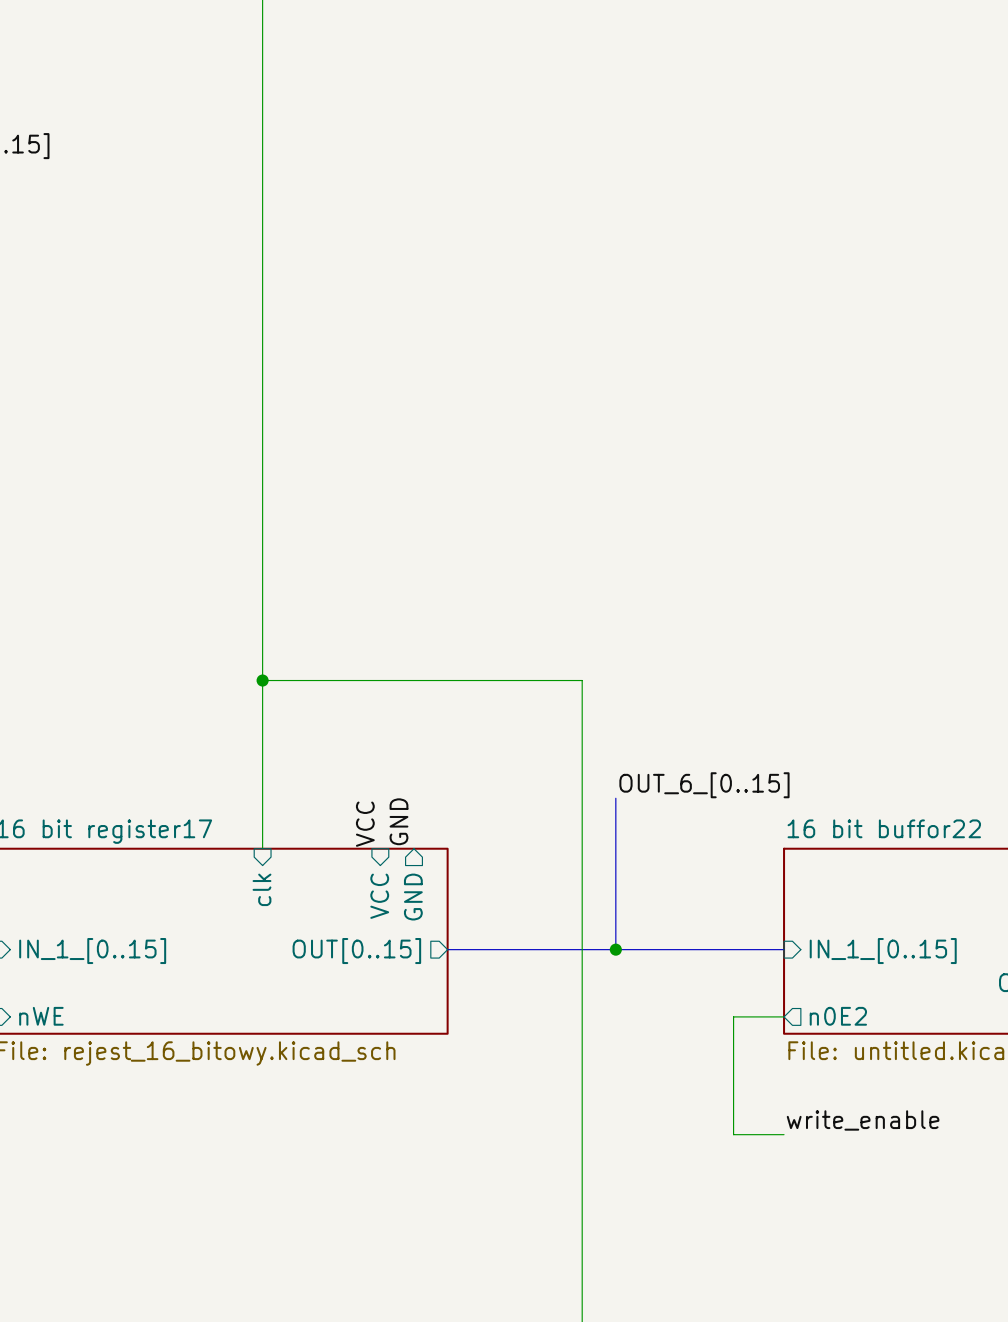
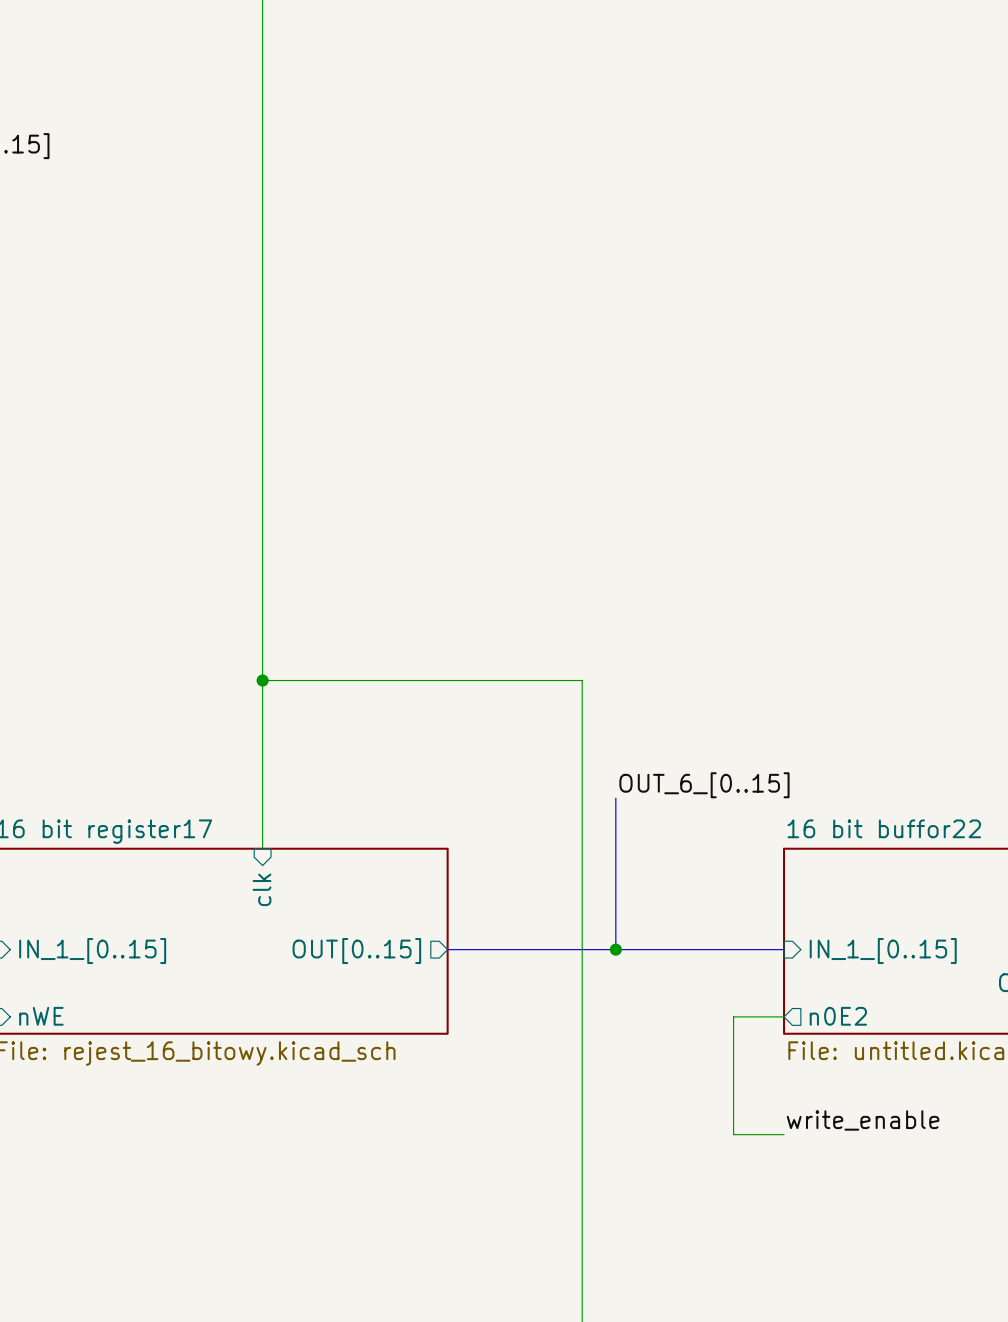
label: GND (398, 821) -> none
label: VCC (365, 824) -> none
sheet pin: VCC (379, 896) -> none
sheet pin: GND (413, 897) -> none

